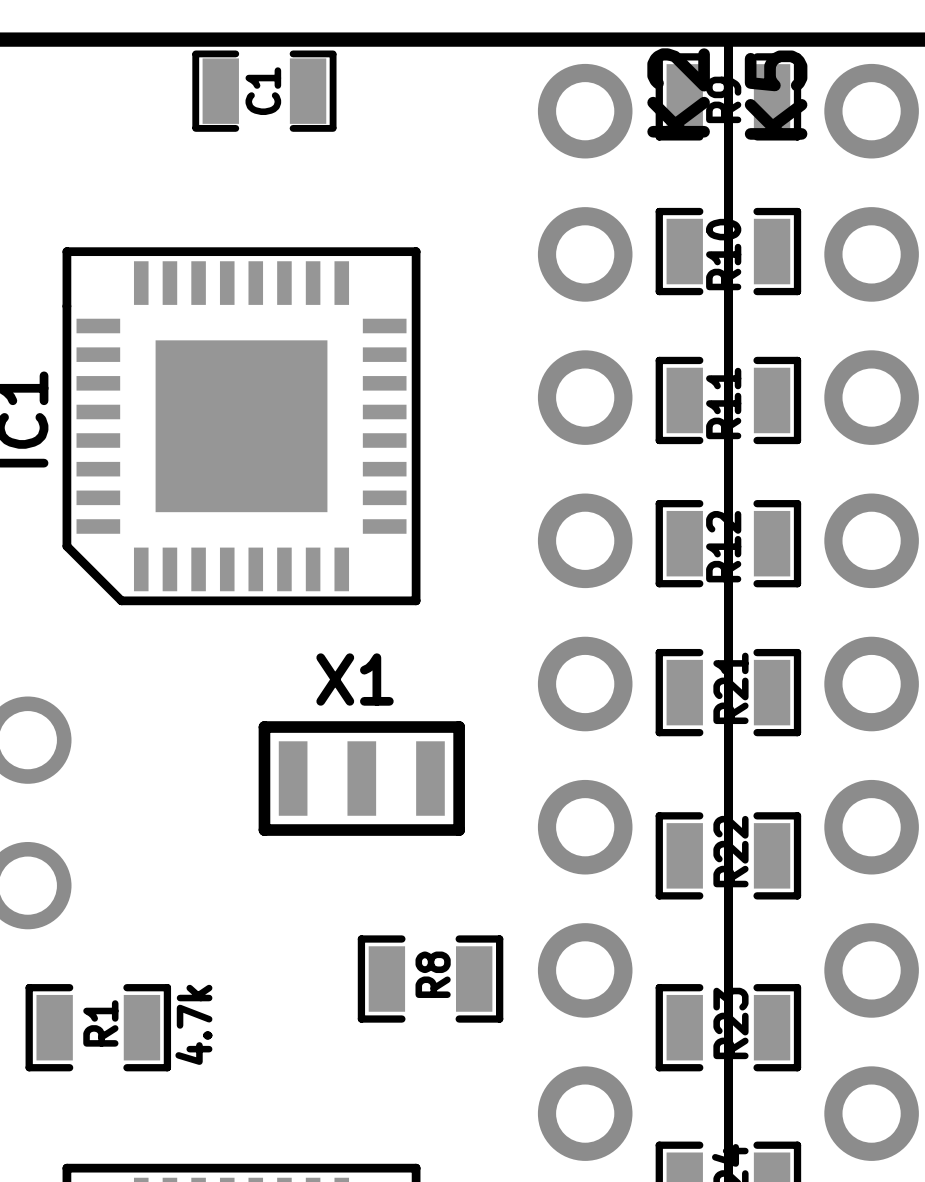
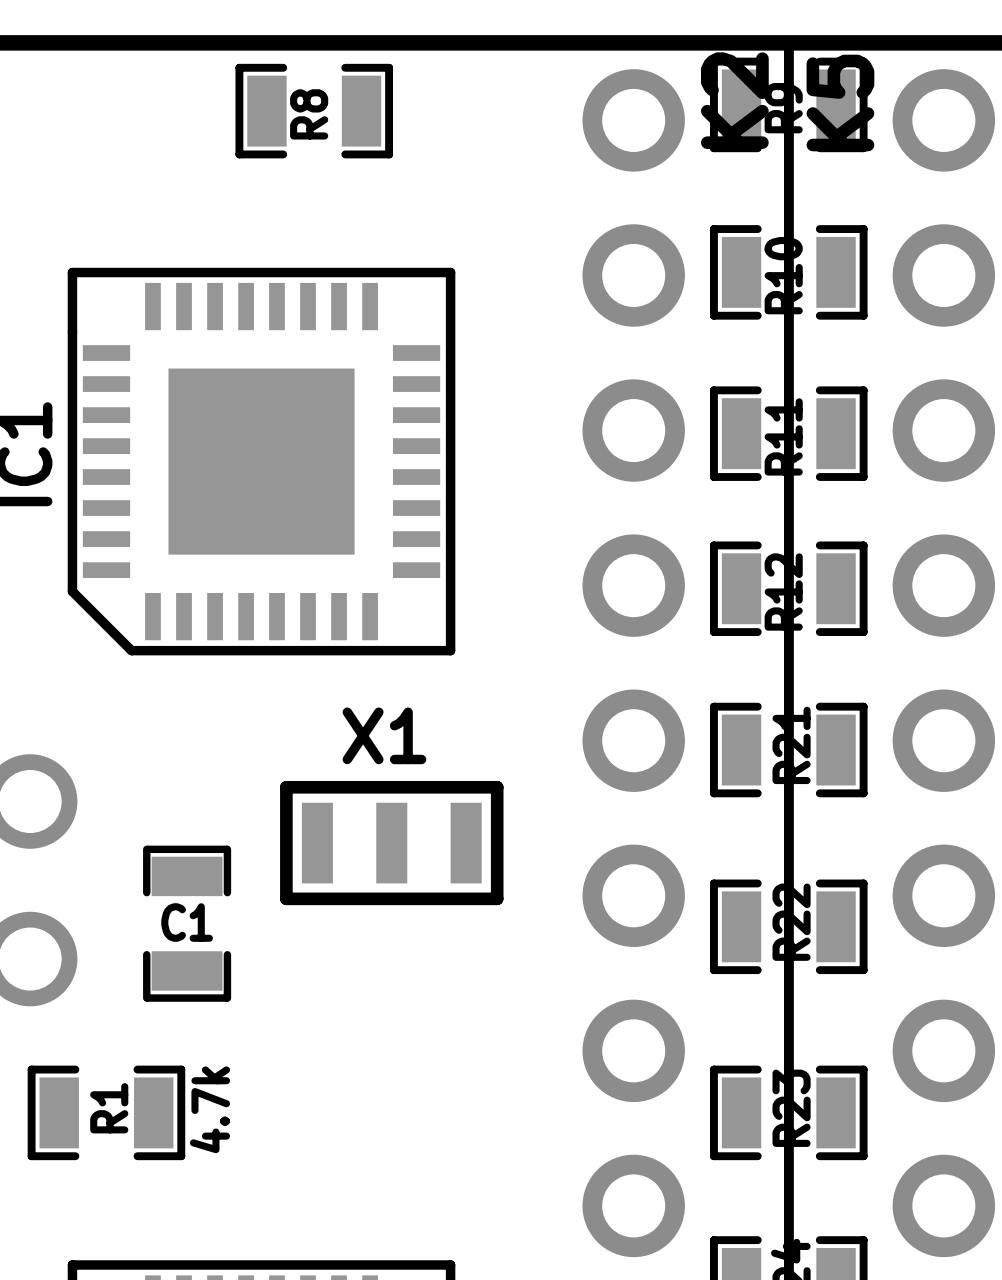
C1 rotation: 0° (264, 91) -> 90° clockwise (187, 923)
C1 position: (264, 91) -> (187, 923)
R8 name position: R8 (433, 974) -> R8 (309, 114)
R8 position: (430, 979) -> (314, 111)

